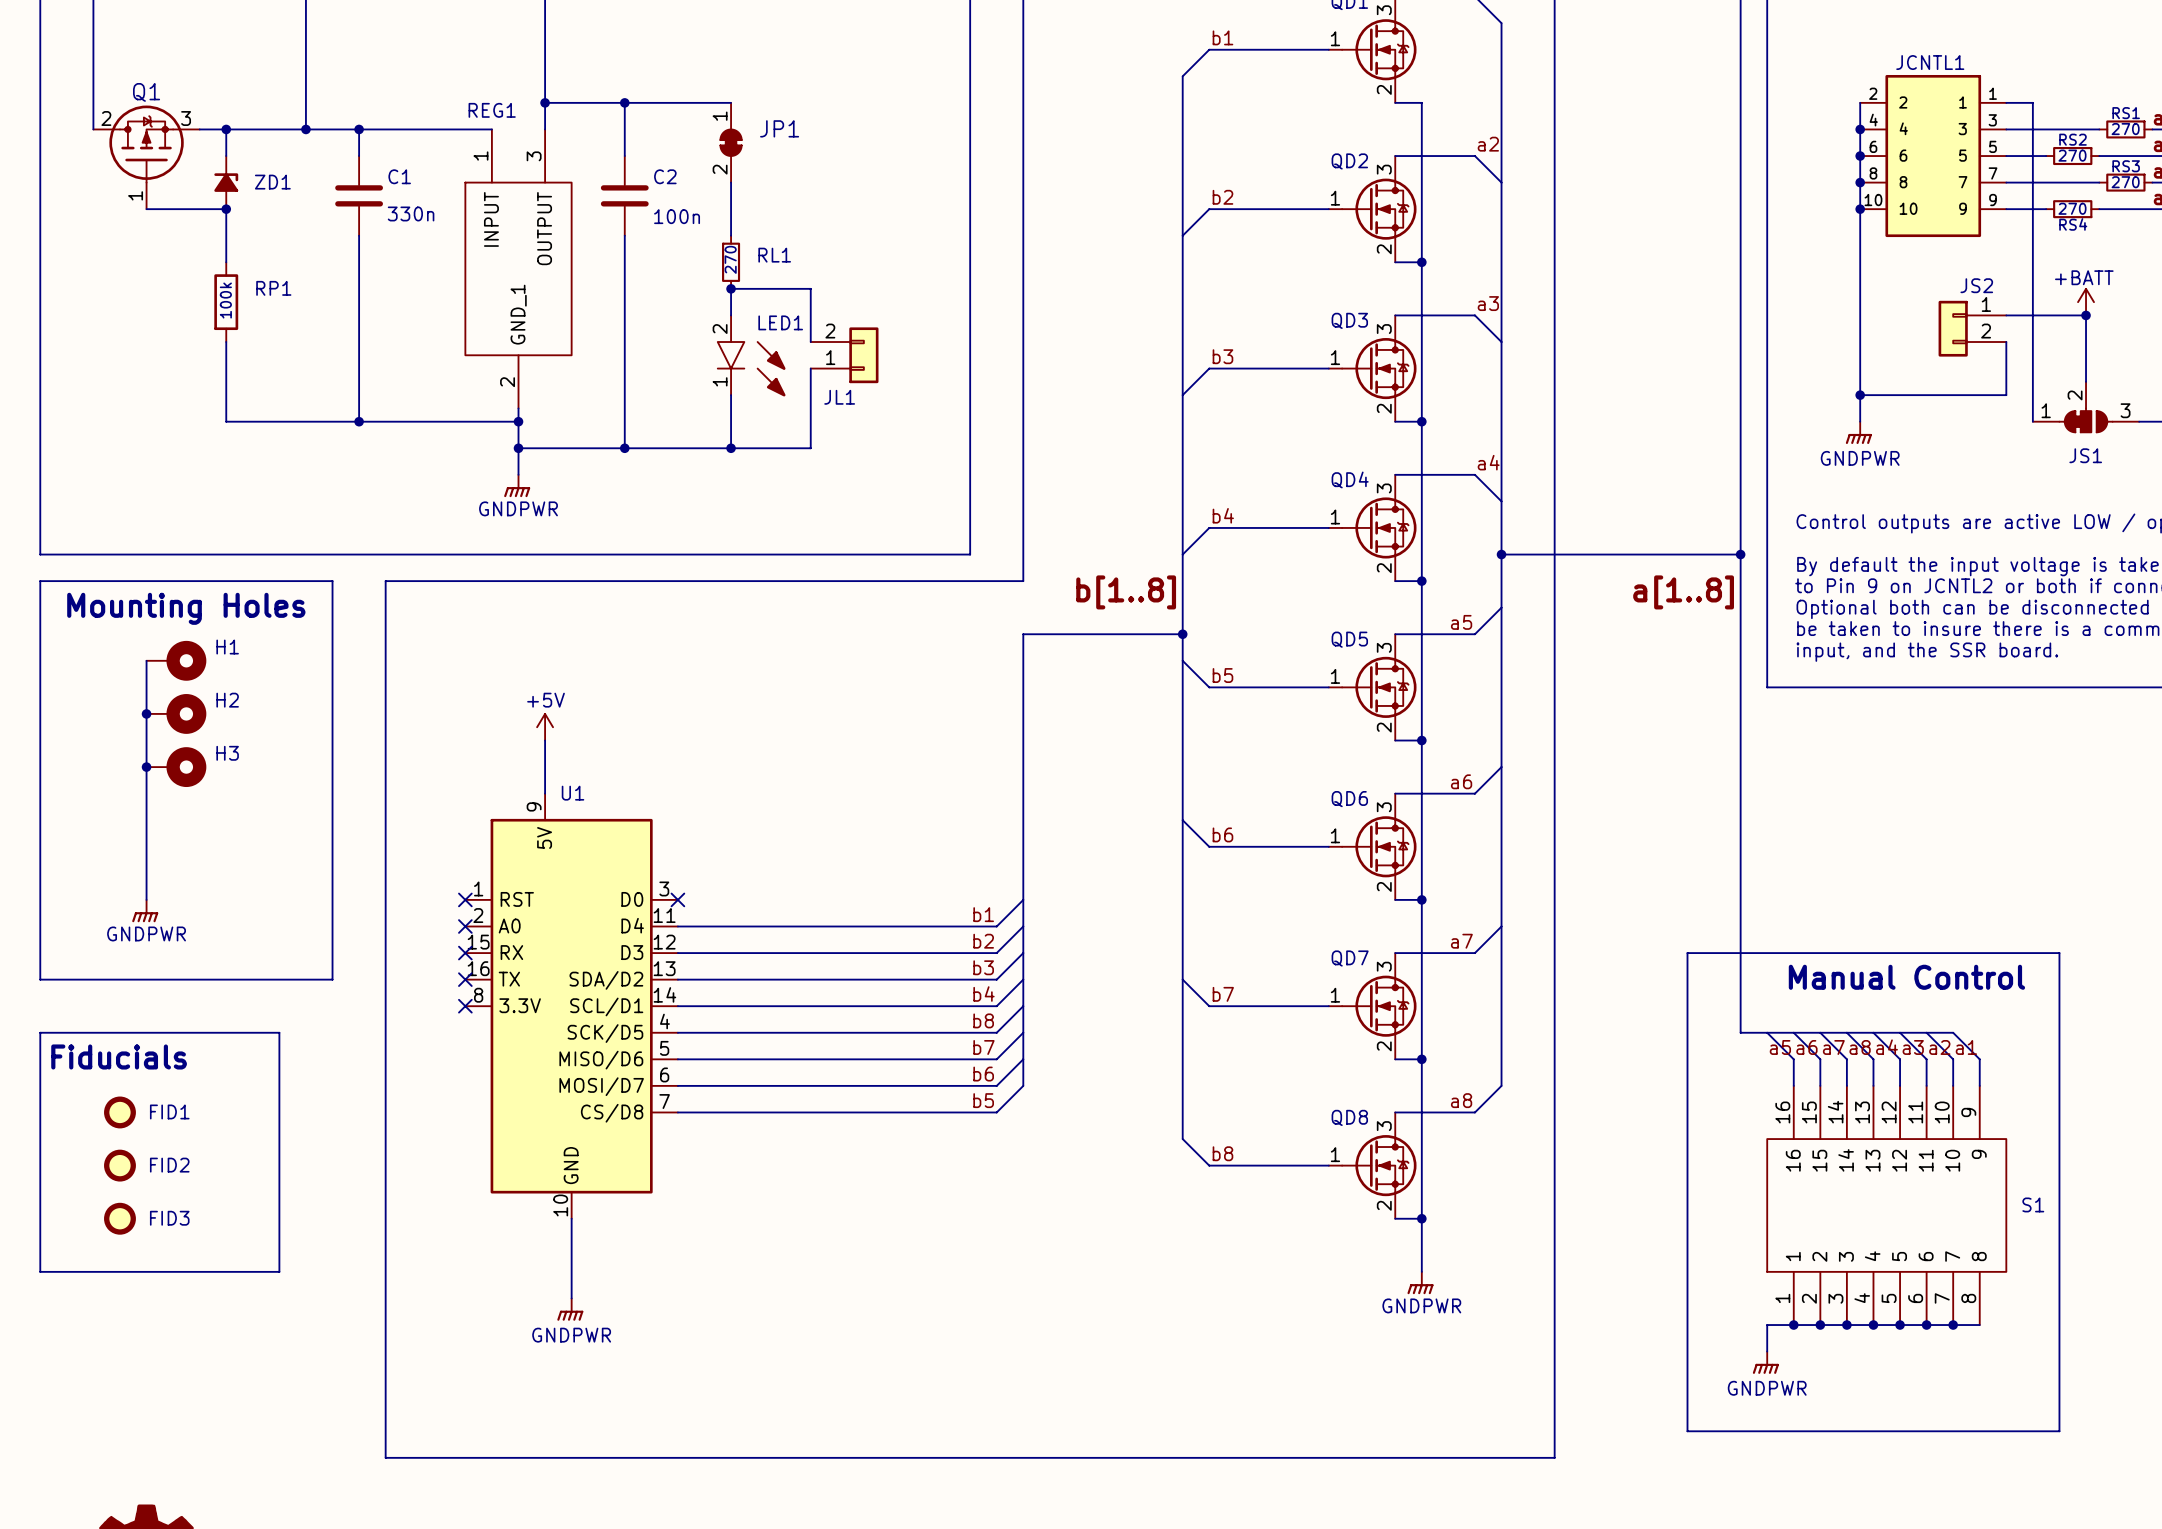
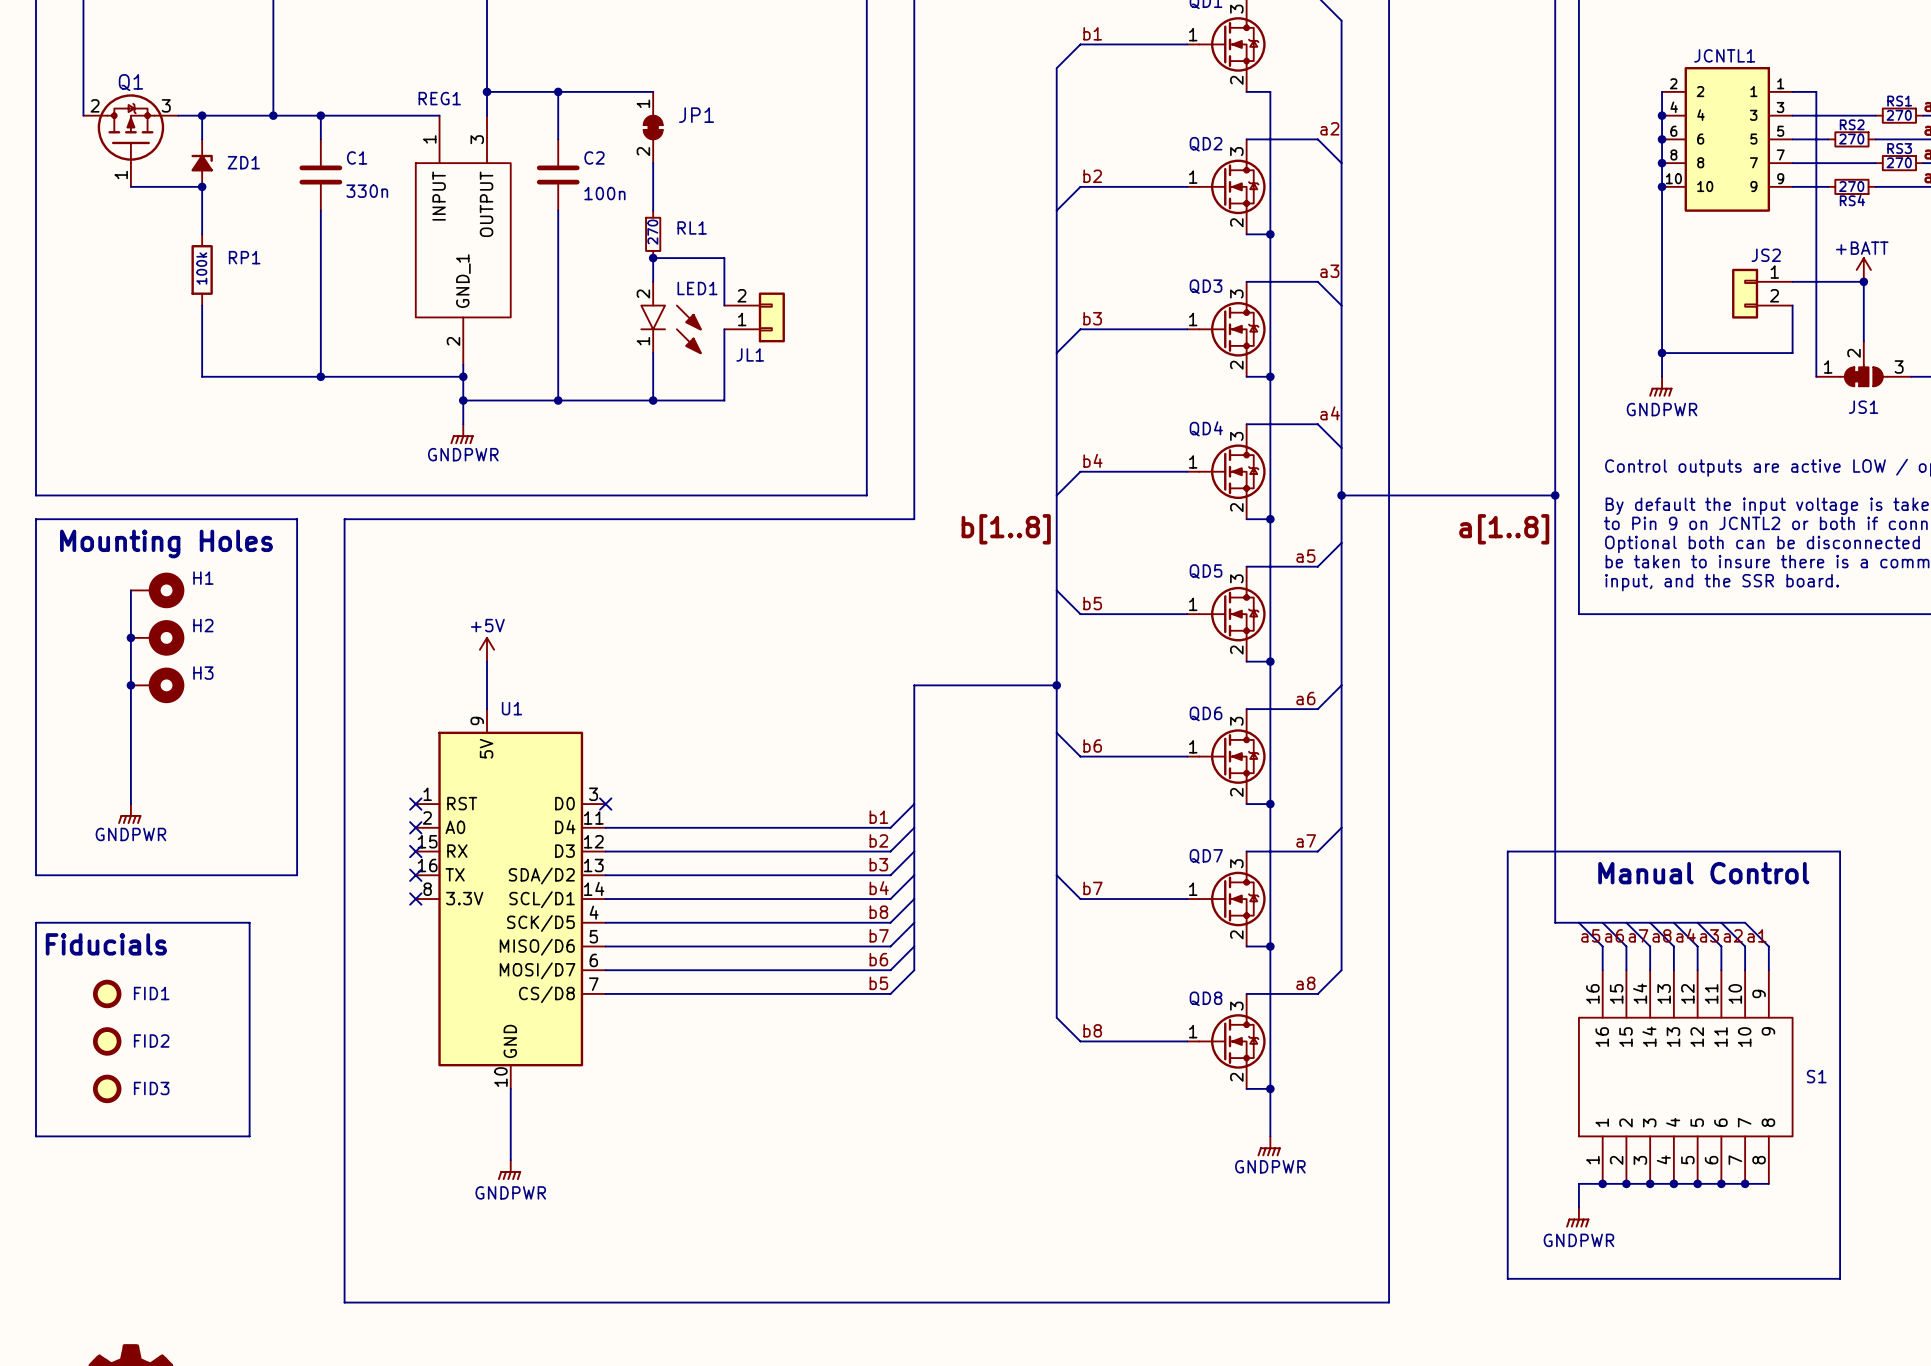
bus: (1182, 634) (1023, 634) (1023, 767) -> (1056, 685) (914, 685)
junction: (1182, 634) -> none
junction: none -> (1056, 685)

